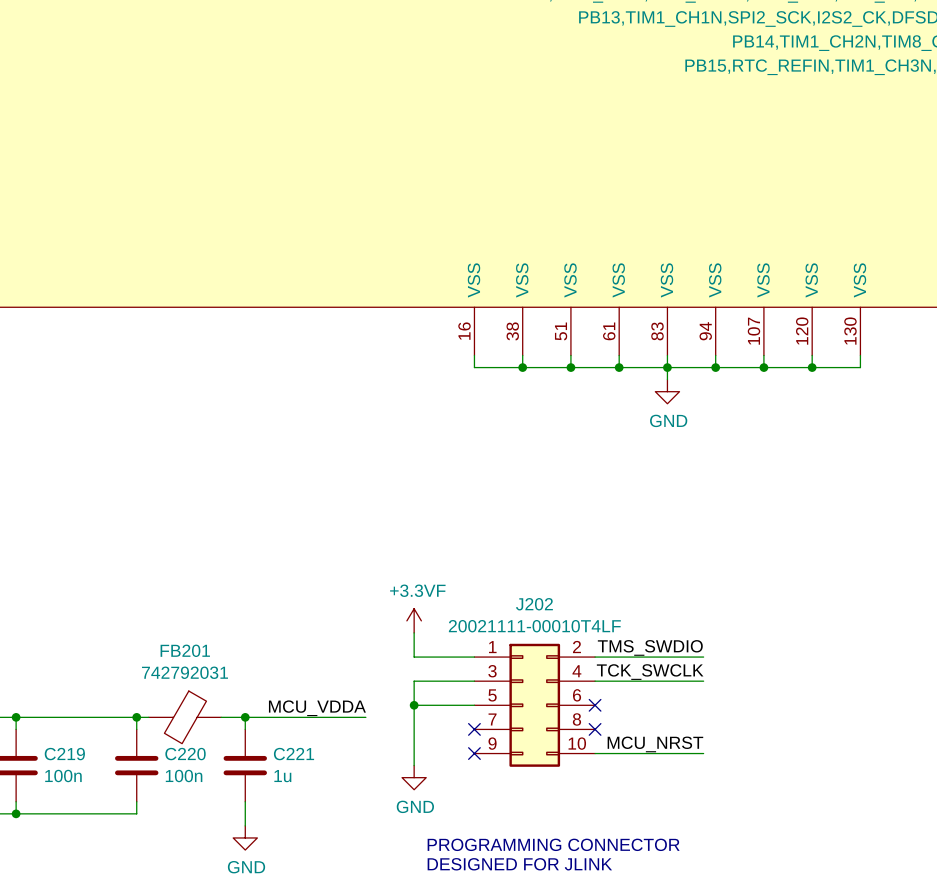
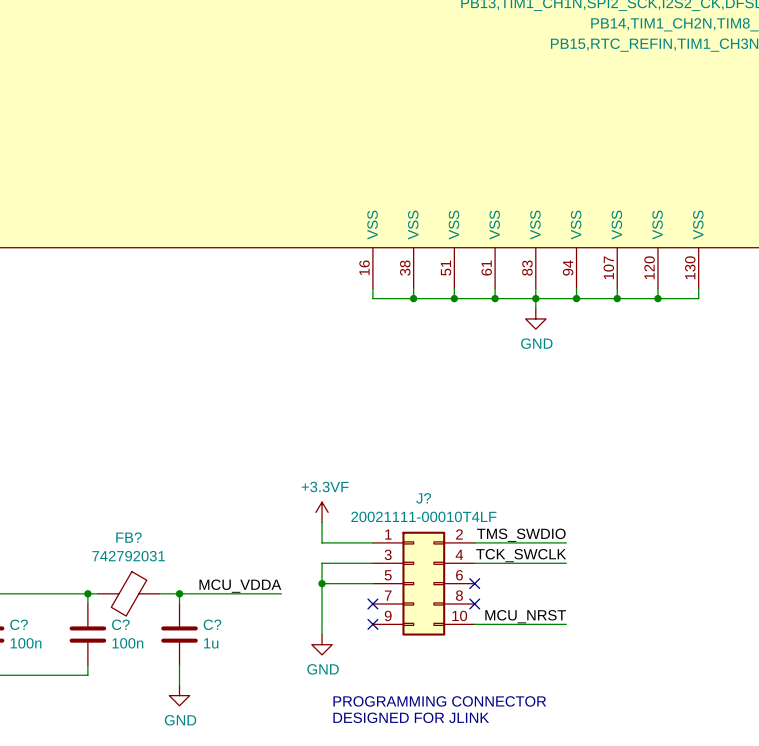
J202 name: J202 (534, 604) -> J? (423, 498)
FB201 name: FB201 (185, 650) -> FB? (128, 537)
C219 name: C219 (64, 754) -> C? (19, 624)
C220 name: C220 (185, 754) -> C? (120, 624)
C221 name: C221 (293, 754) -> C? (212, 624)

